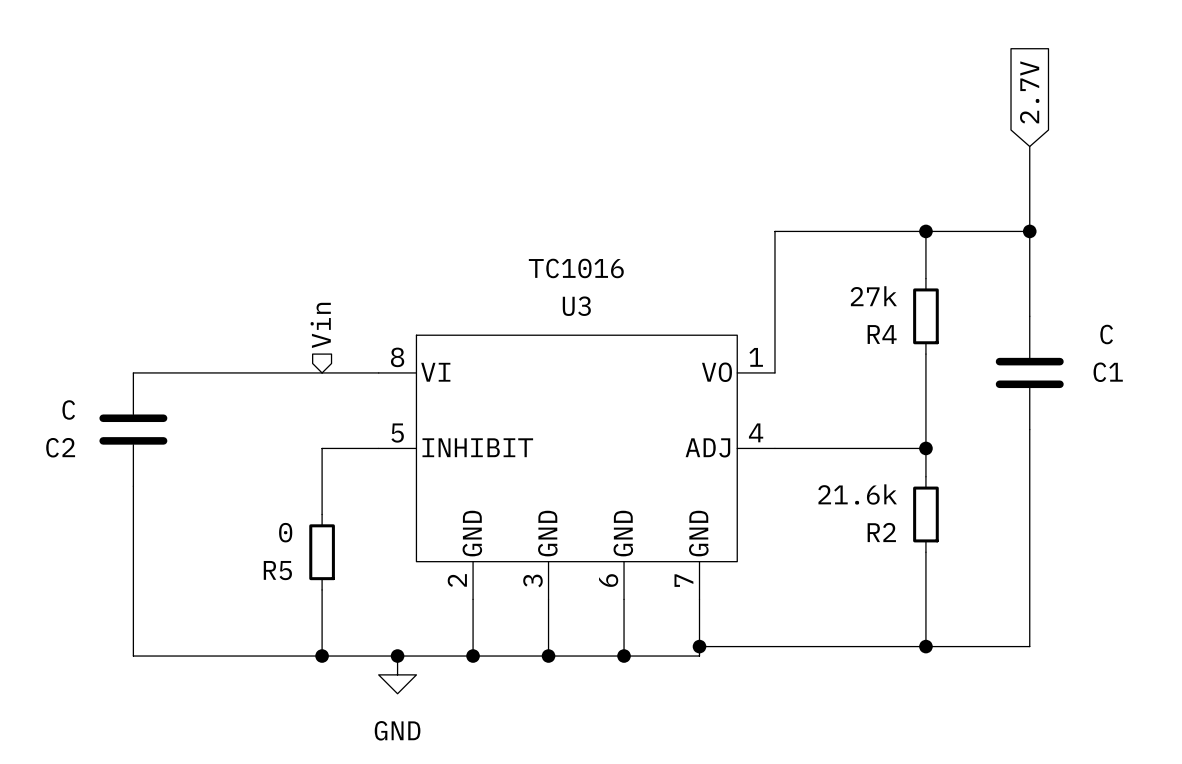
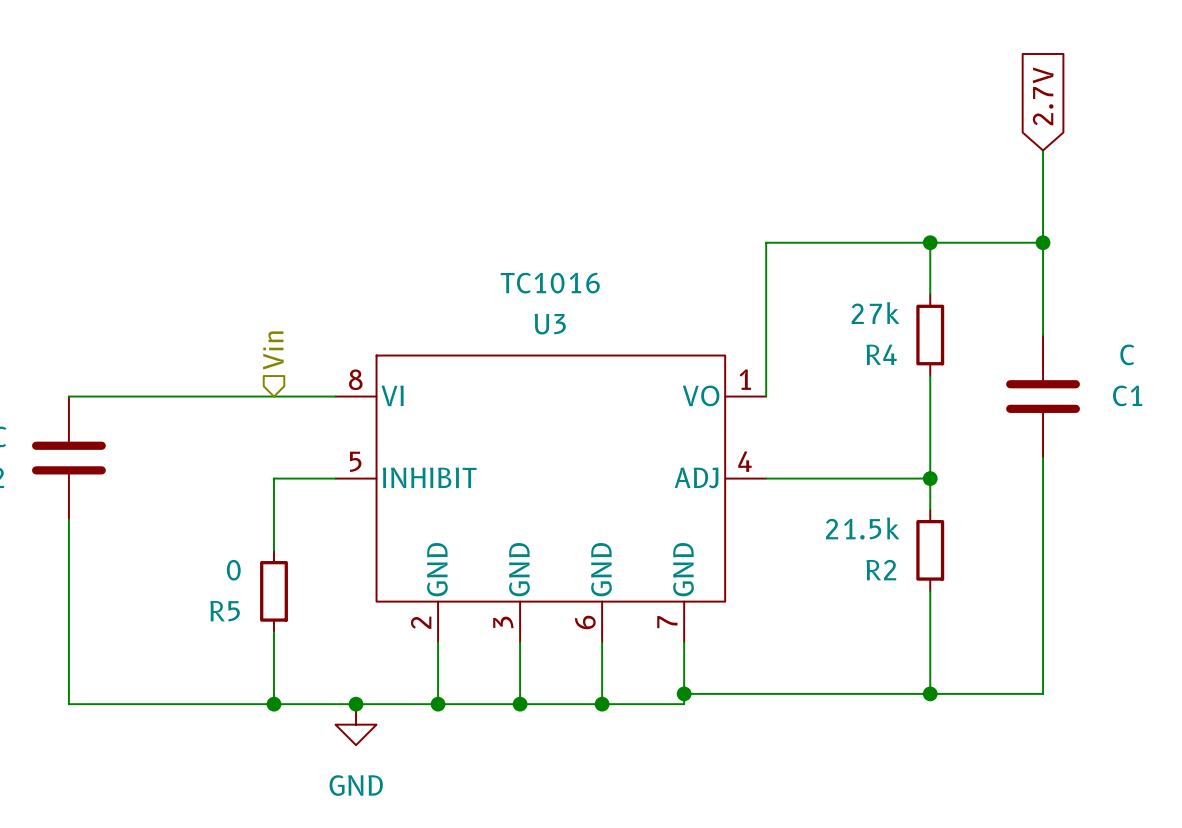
R2 value: 21.6k (857, 494) -> 21.5k (862, 528)

